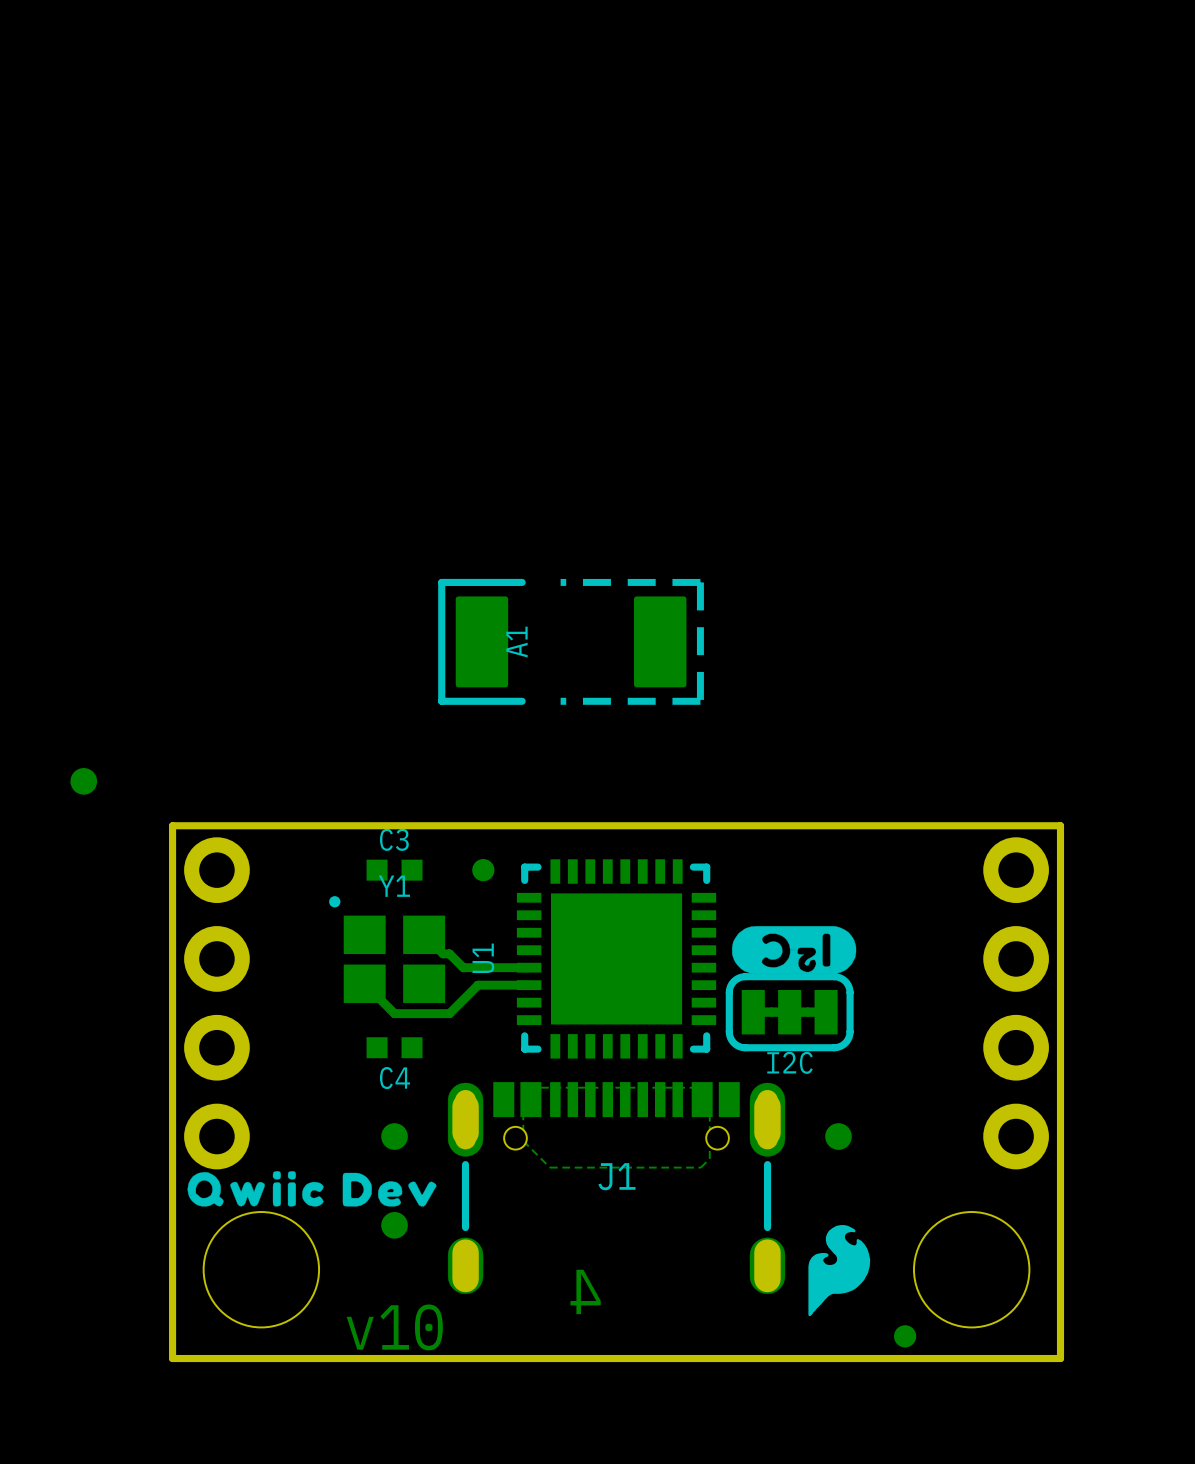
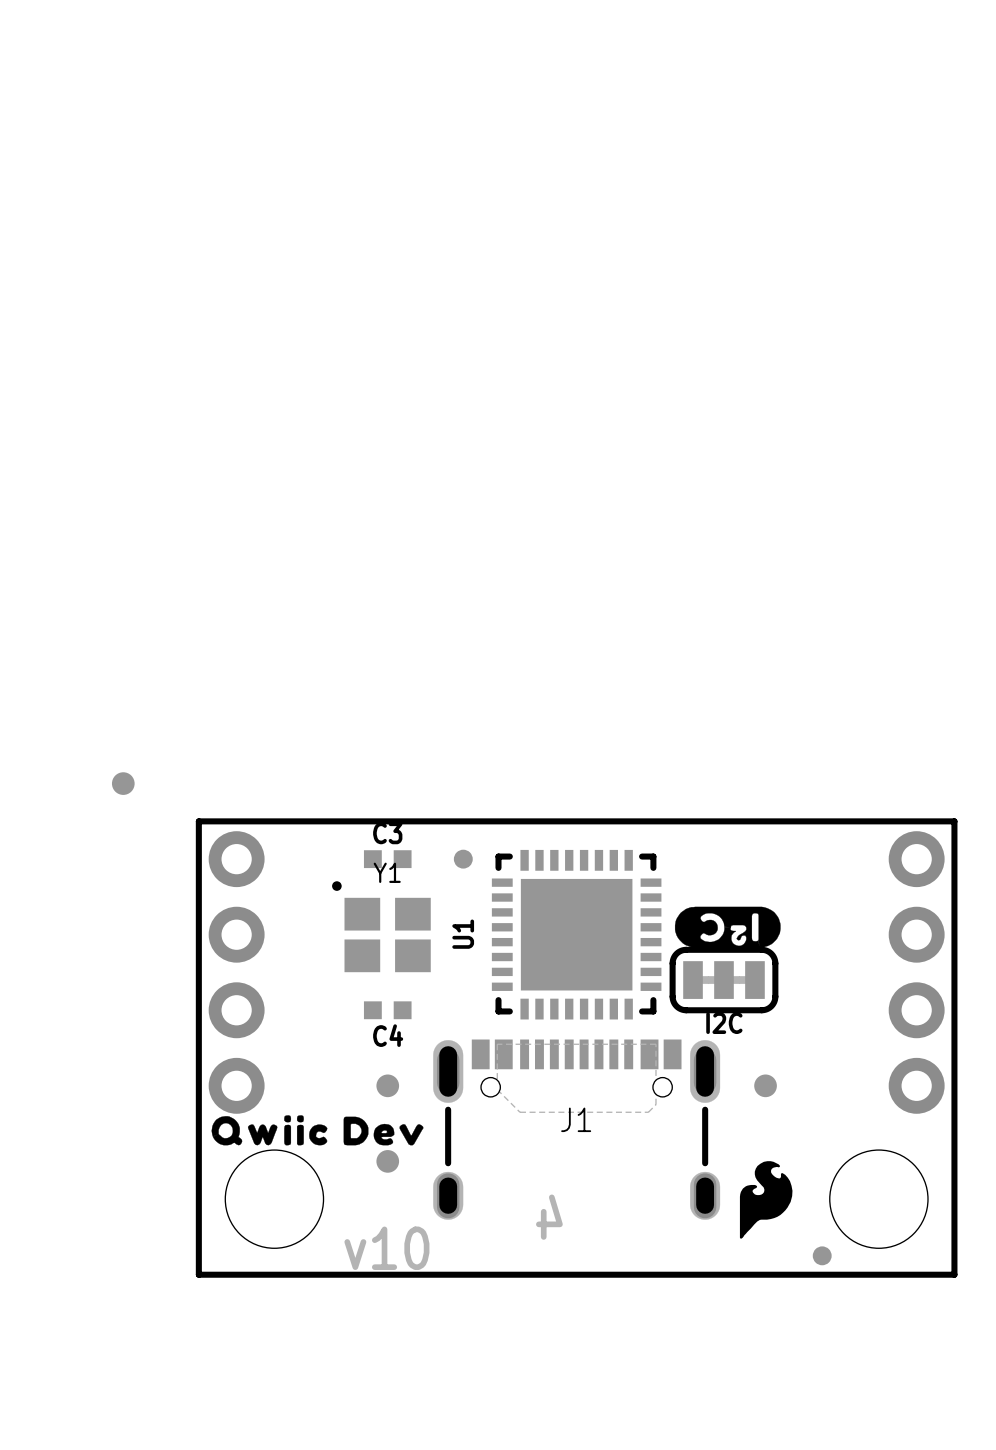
A1: (571, 641) -> none
track: (424, 934) (443, 953) (449, 953) (463, 967) (529, 967) -> none
track: (364, 983) (394, 1013) (449, 1013) (477, 985) (529, 985) -> none

